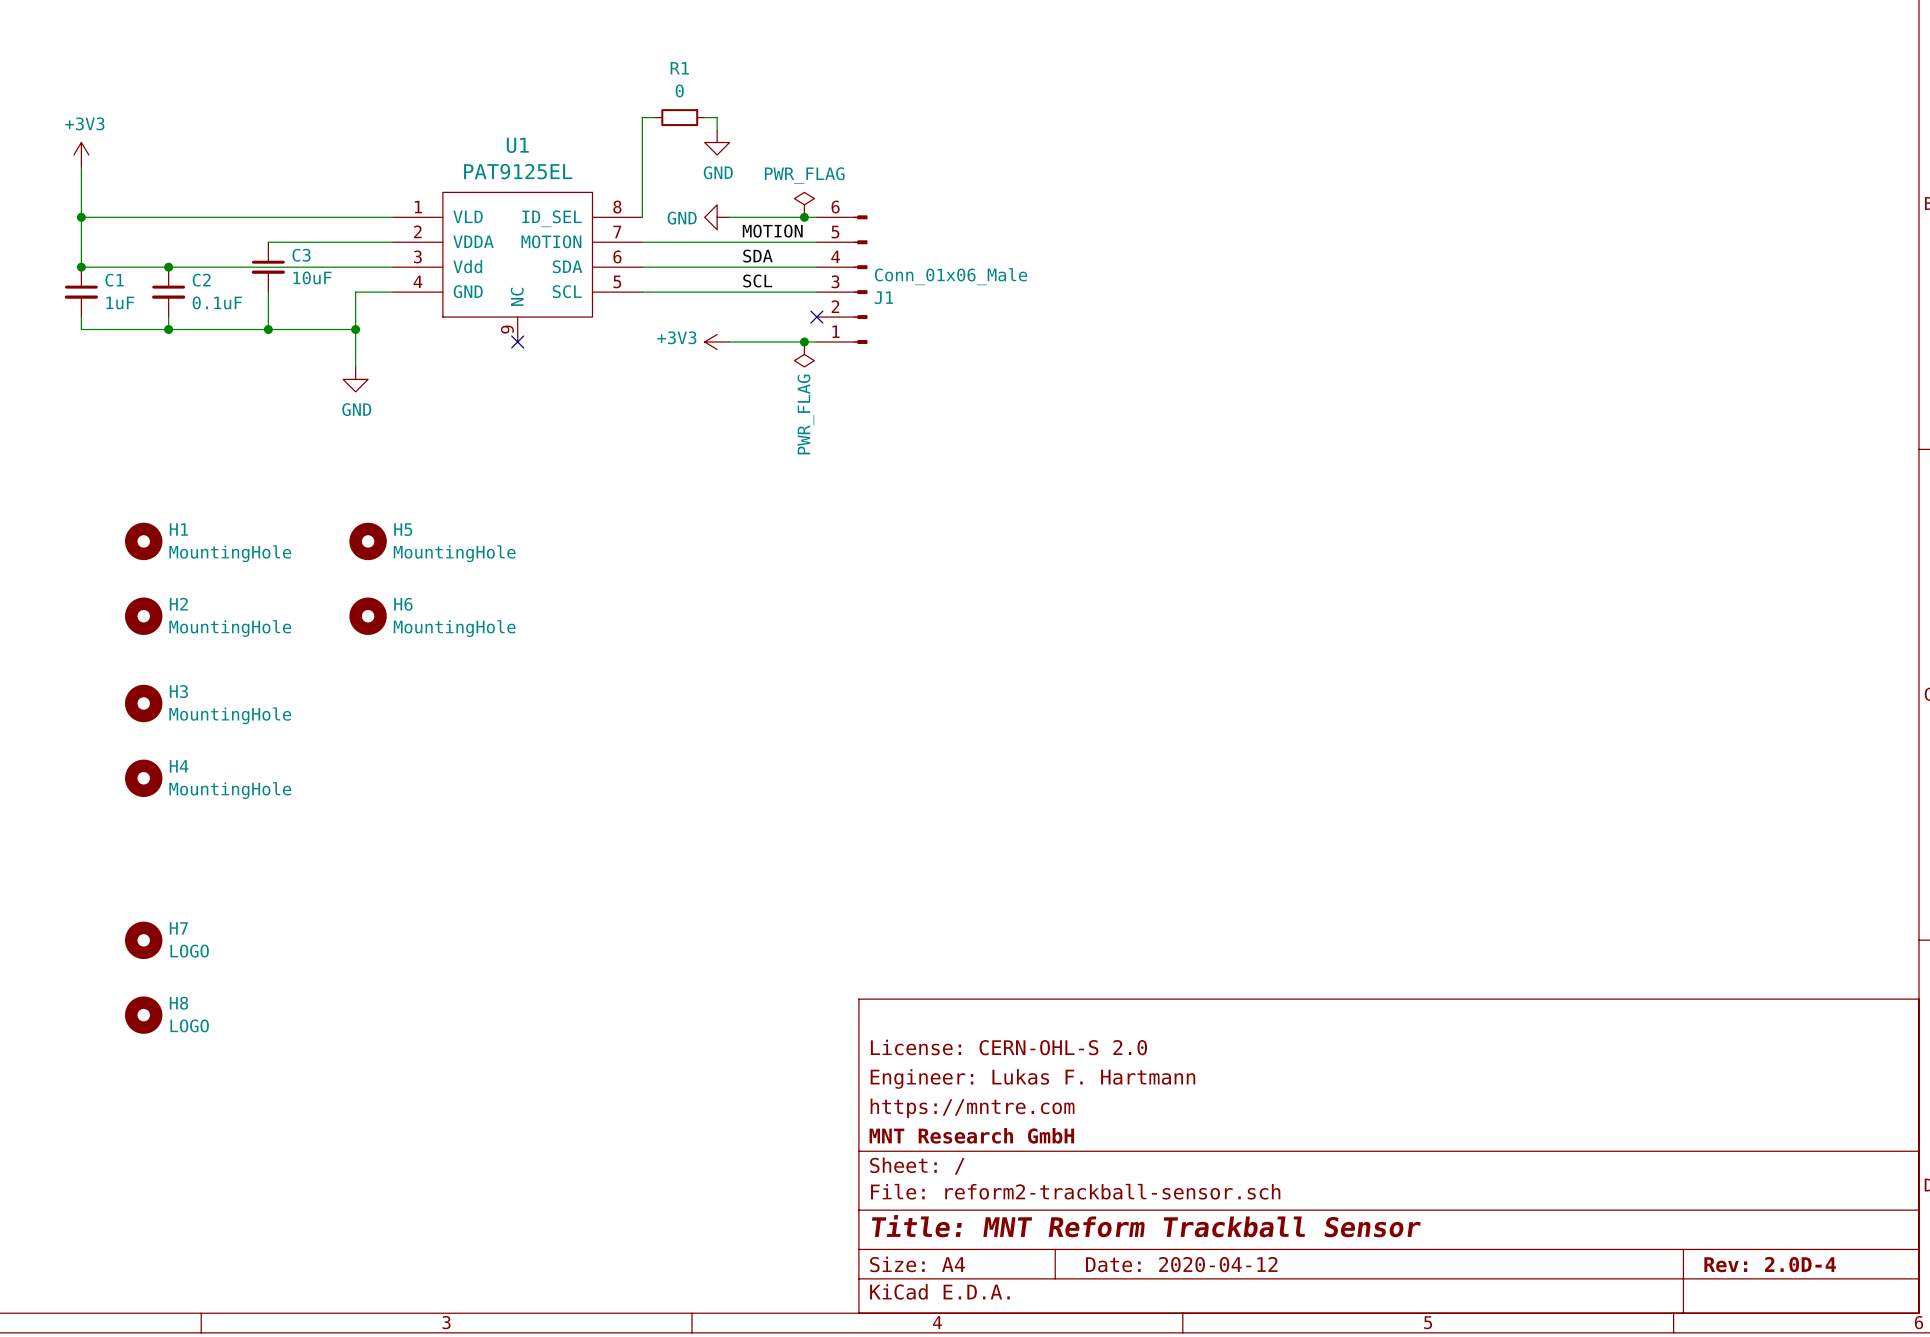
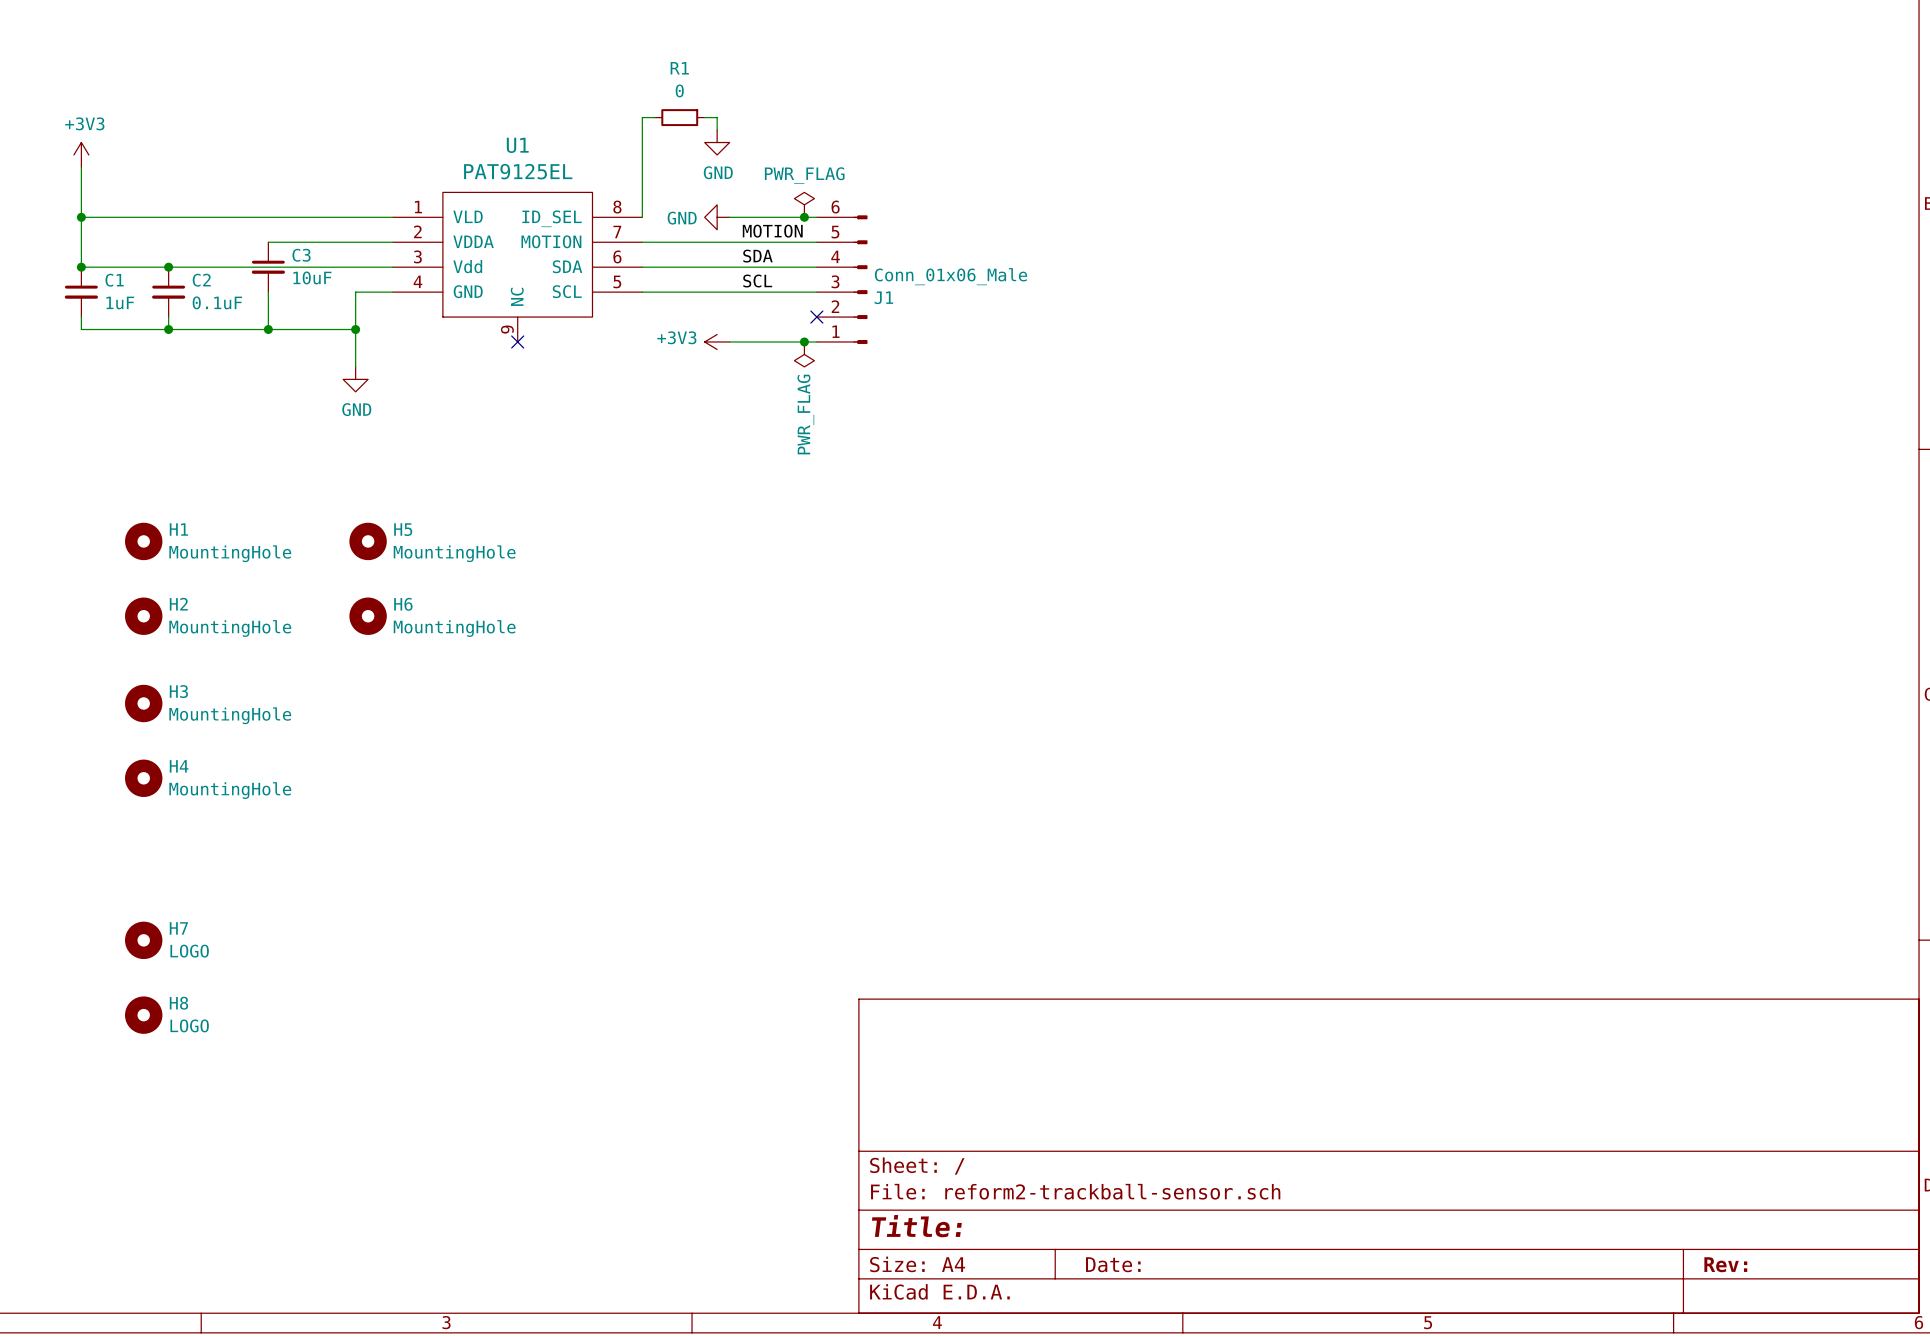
title block: License: CERN-OHL-S 2.0 (1008, 1047) -> none
title block: Engineer: Lukas F. Hartmann (1032, 1078) -> none
title block: https://mntre.com (972, 1108) -> none
title block: MNT Research GmbH (971, 1135) -> none
title block: Title: MNT Reform Trackball Sensor (1146, 1226) -> Title: (916, 1226)
title block: Date: 2020-04-12 (1181, 1264) -> Date: (1113, 1264)
title block: Rev: 2.0D-4 (1770, 1264) -> Rev: (1725, 1264)

